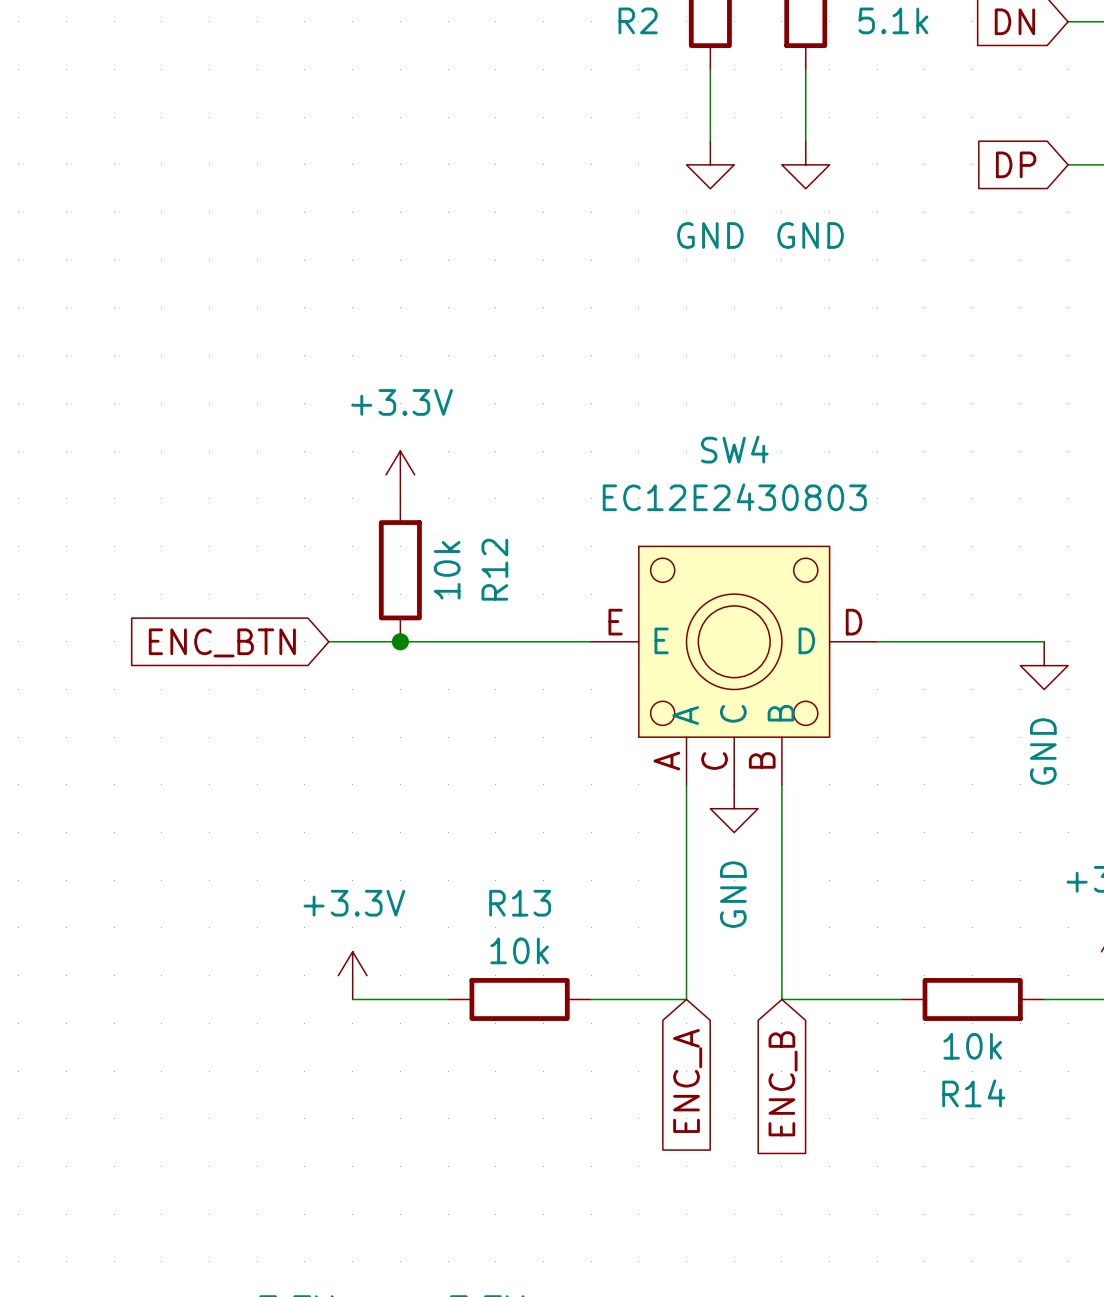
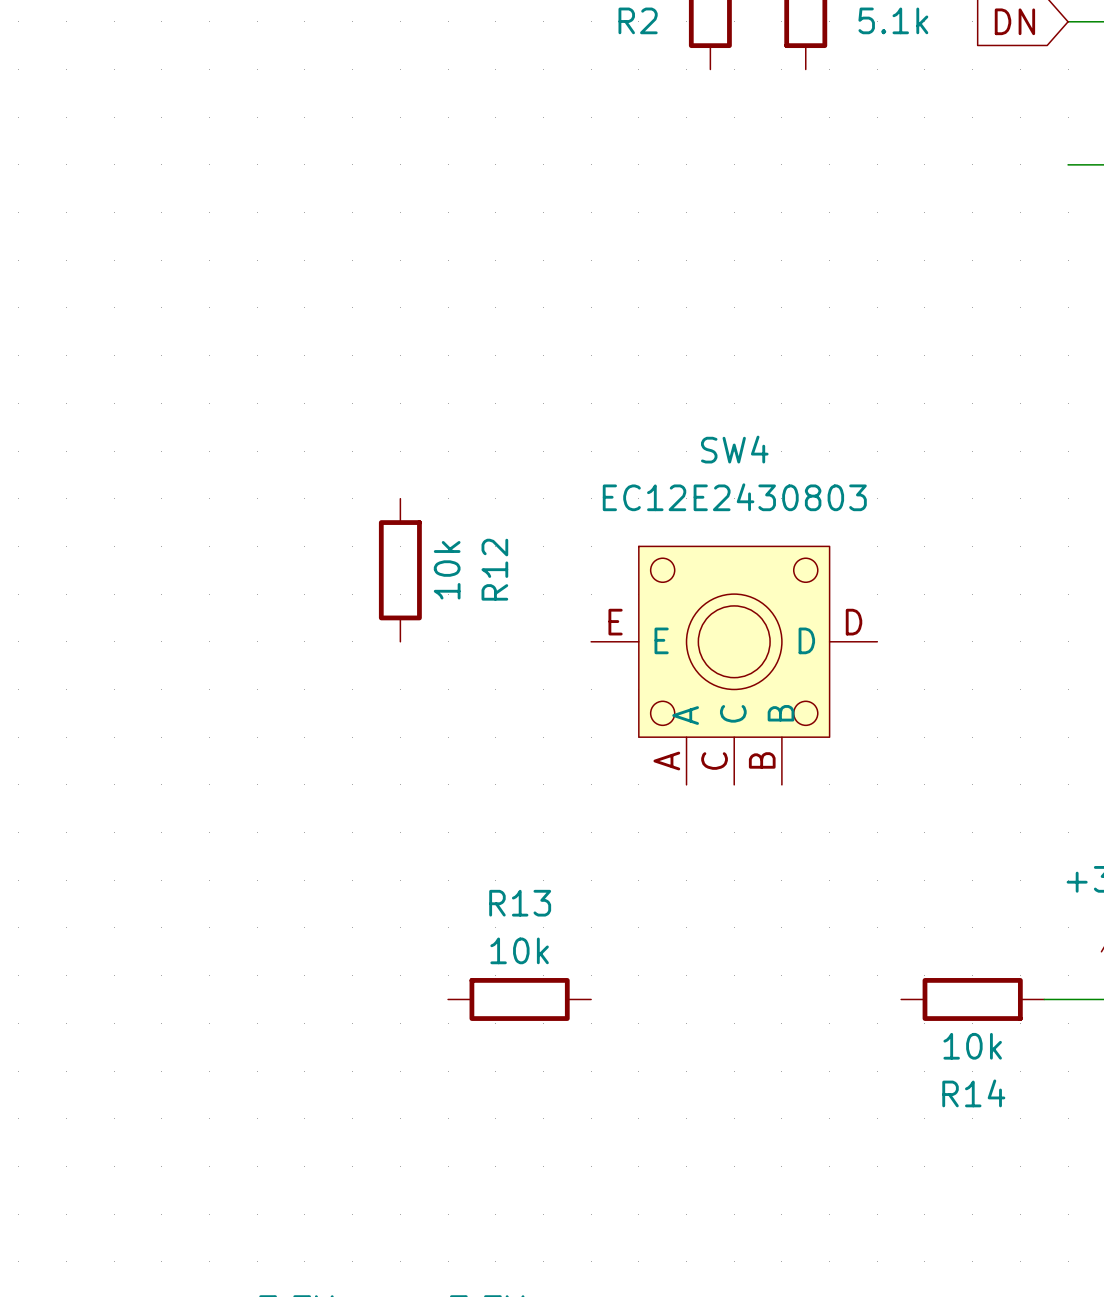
wire: (710, 69) (710, 141) -> none
wire: (805, 69) (805, 141) -> none
power symbol: GND (710, 164) -> none
power symbol: GND (805, 164) -> none
global label: DP (1016, 164) -> none
power symbol: +3.3V (400, 474) -> none
wire: (328, 641) (591, 641) -> none
junction: (400, 641) -> none
wire: (877, 641) (1044, 641) -> none
global label: ENC_BTN (222, 642) -> none
power symbol: GND (1044, 665) -> none
wire: (686, 784) (686, 999) (591, 999) -> none
wire: (781, 784) (781, 999) (901, 999) -> none
power symbol: GND (734, 808) -> none
power symbol: +3.3V (352, 975) -> none
wire: (352, 999) (448, 999) -> none
global label: ENC_A (687, 1080) -> none
global label: ENC_B (783, 1083) -> none

